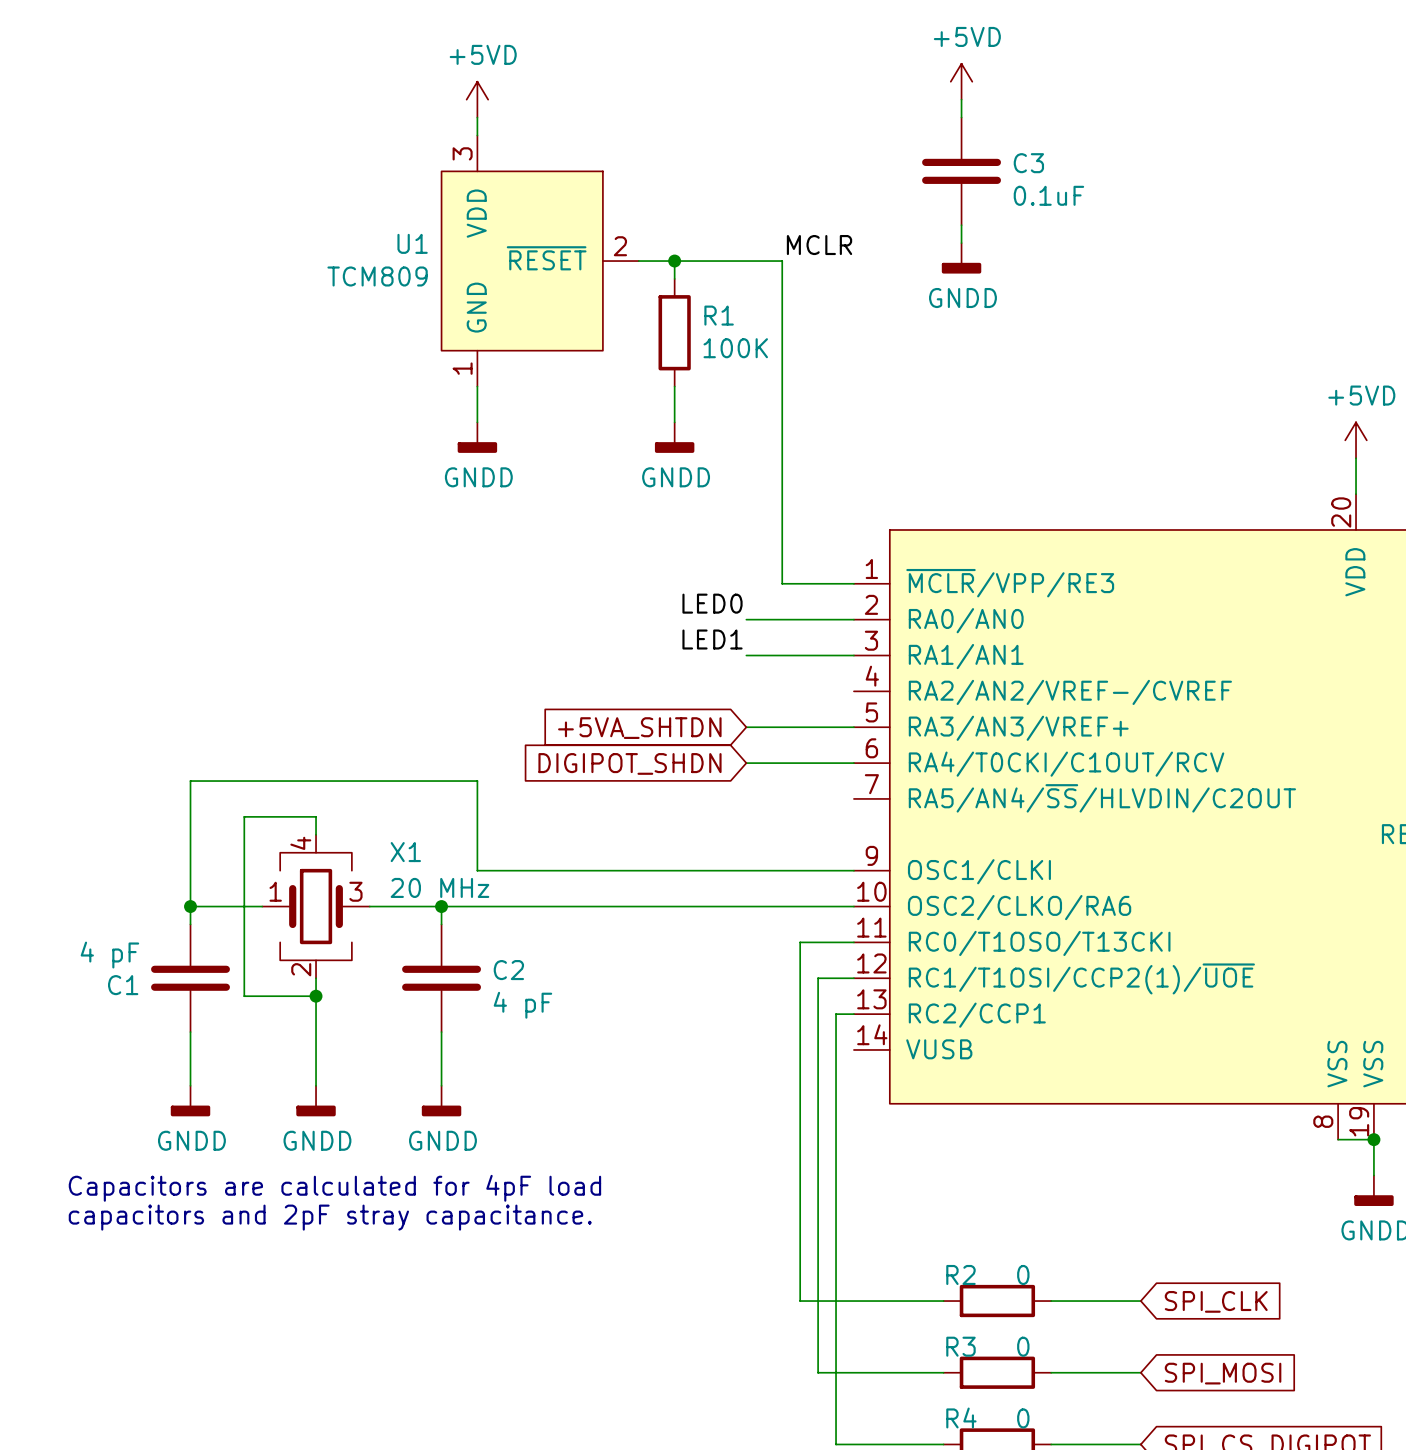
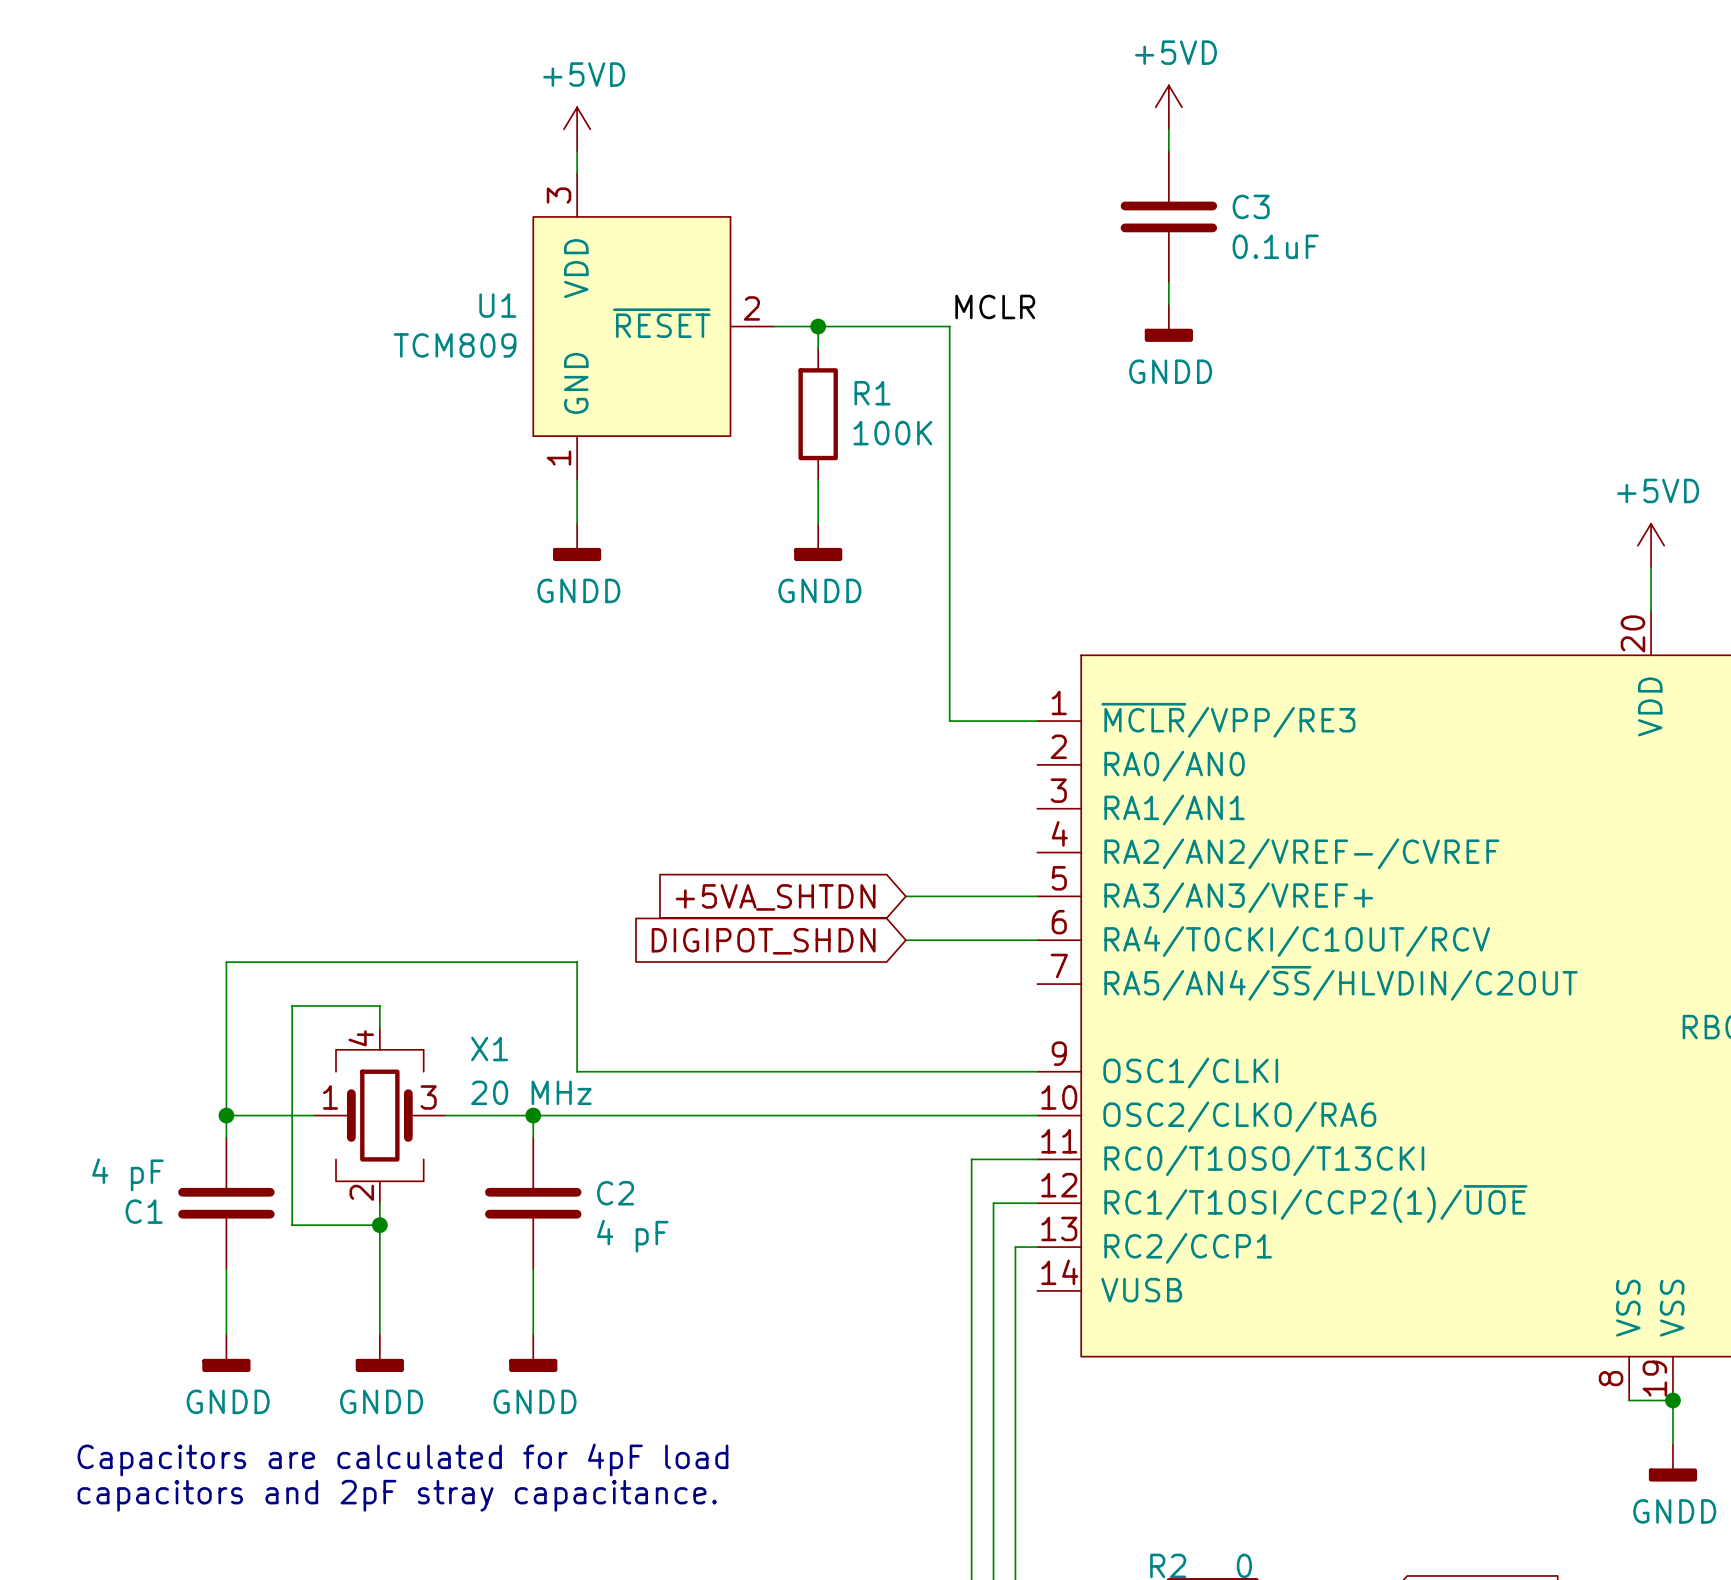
label: LED0 (712, 603) -> none
wire: (746, 619) (853, 619) -> none
label: LED1 (712, 639) -> none
wire: (746, 655) (853, 655) -> none

